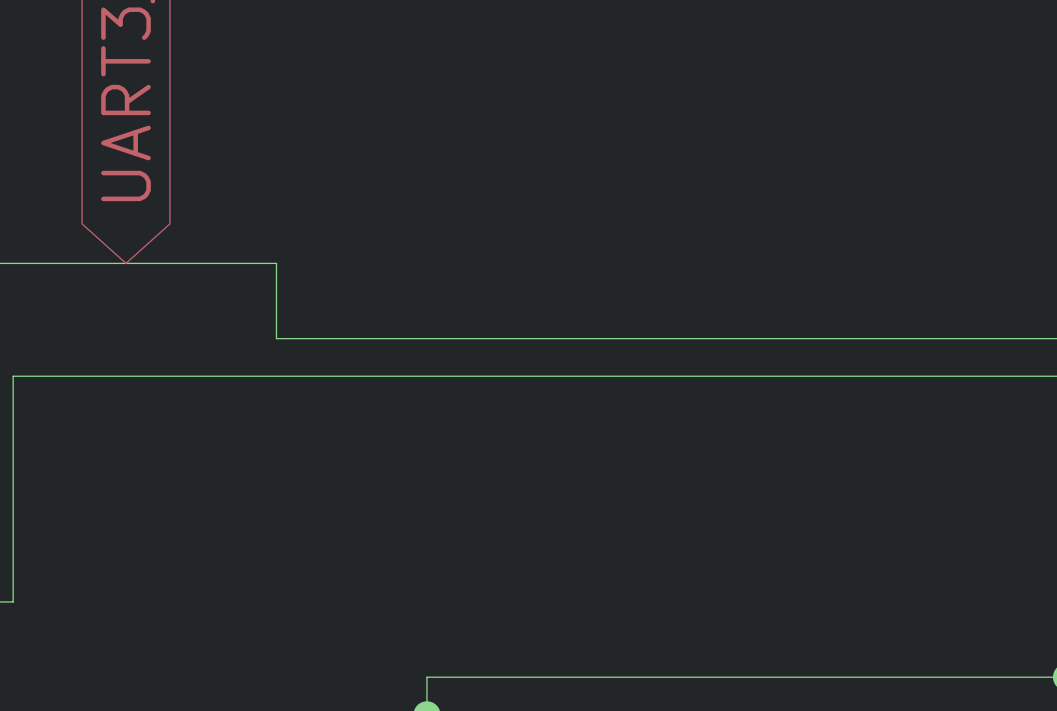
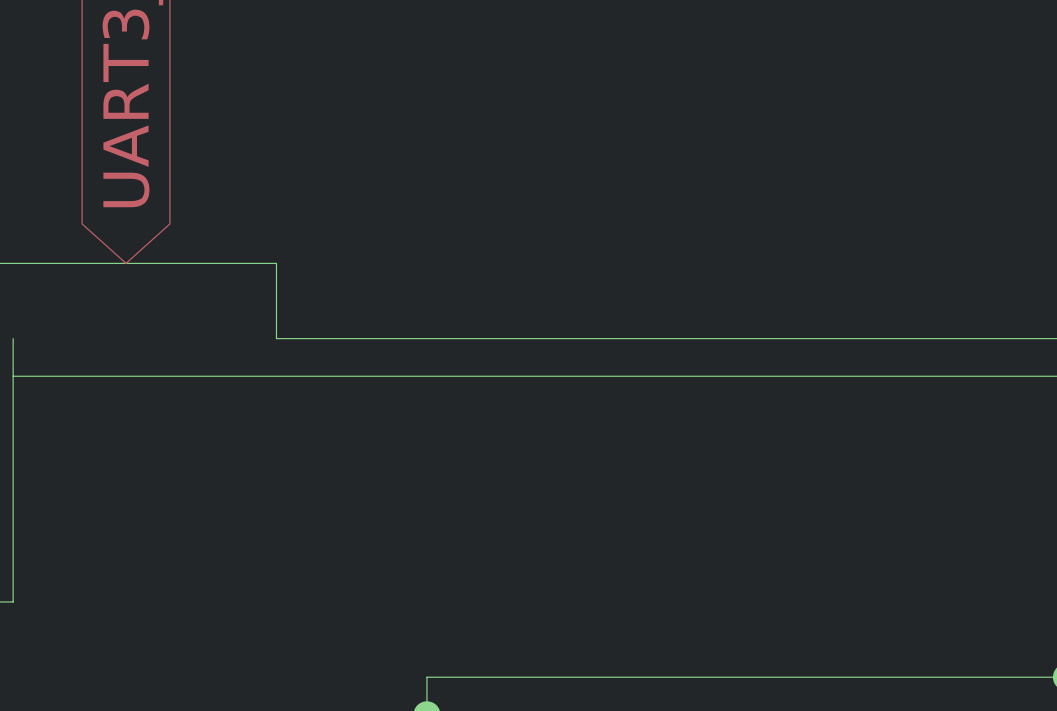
wire: none -> (13, 338) (13, 376)

